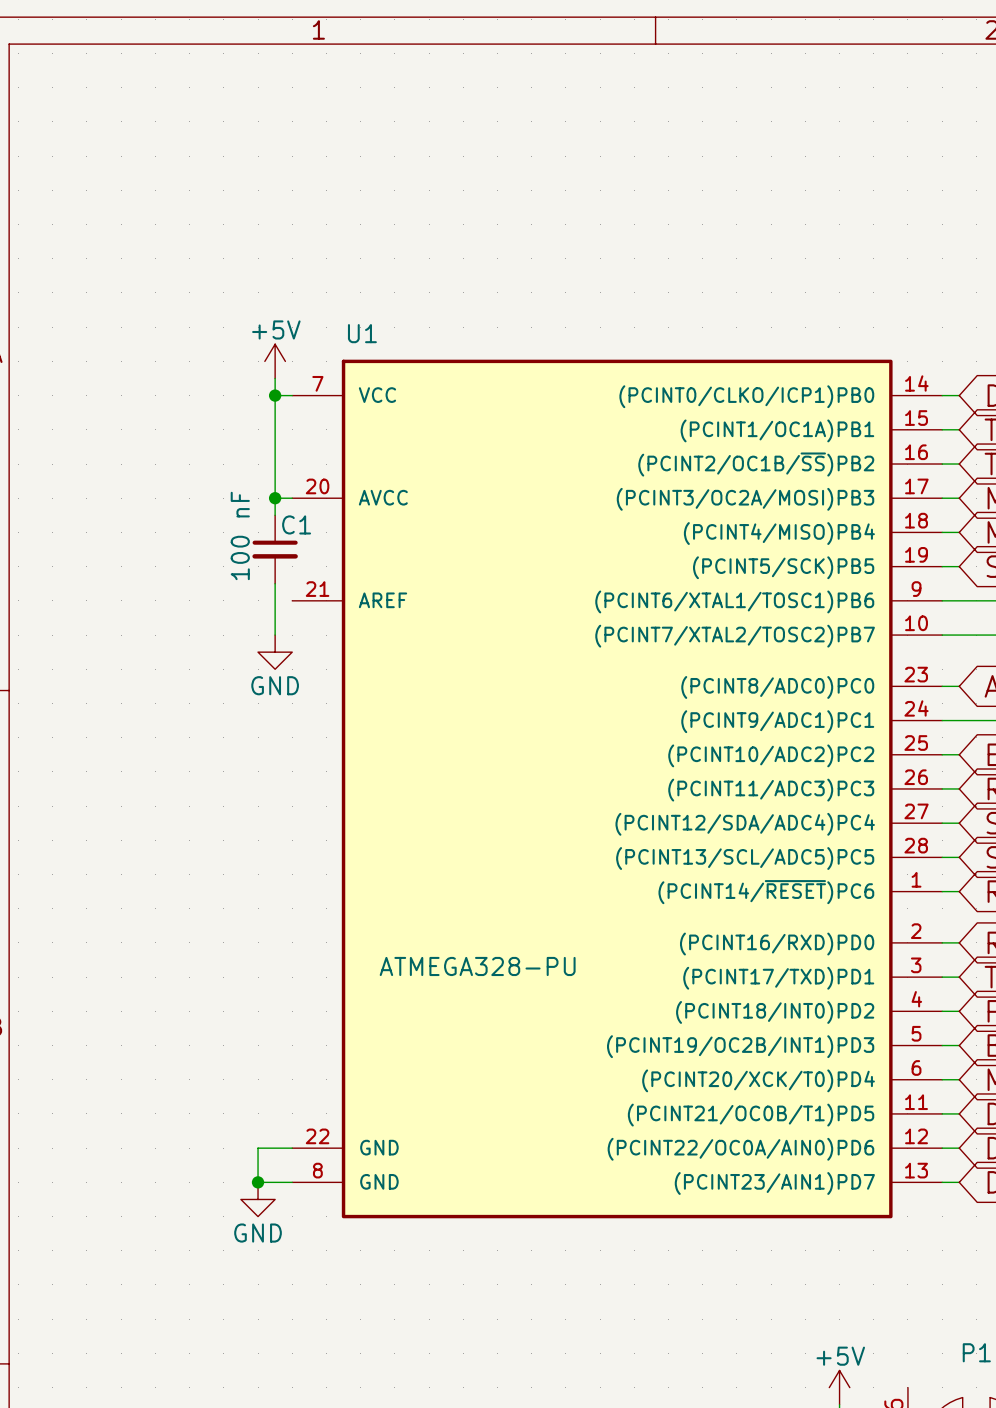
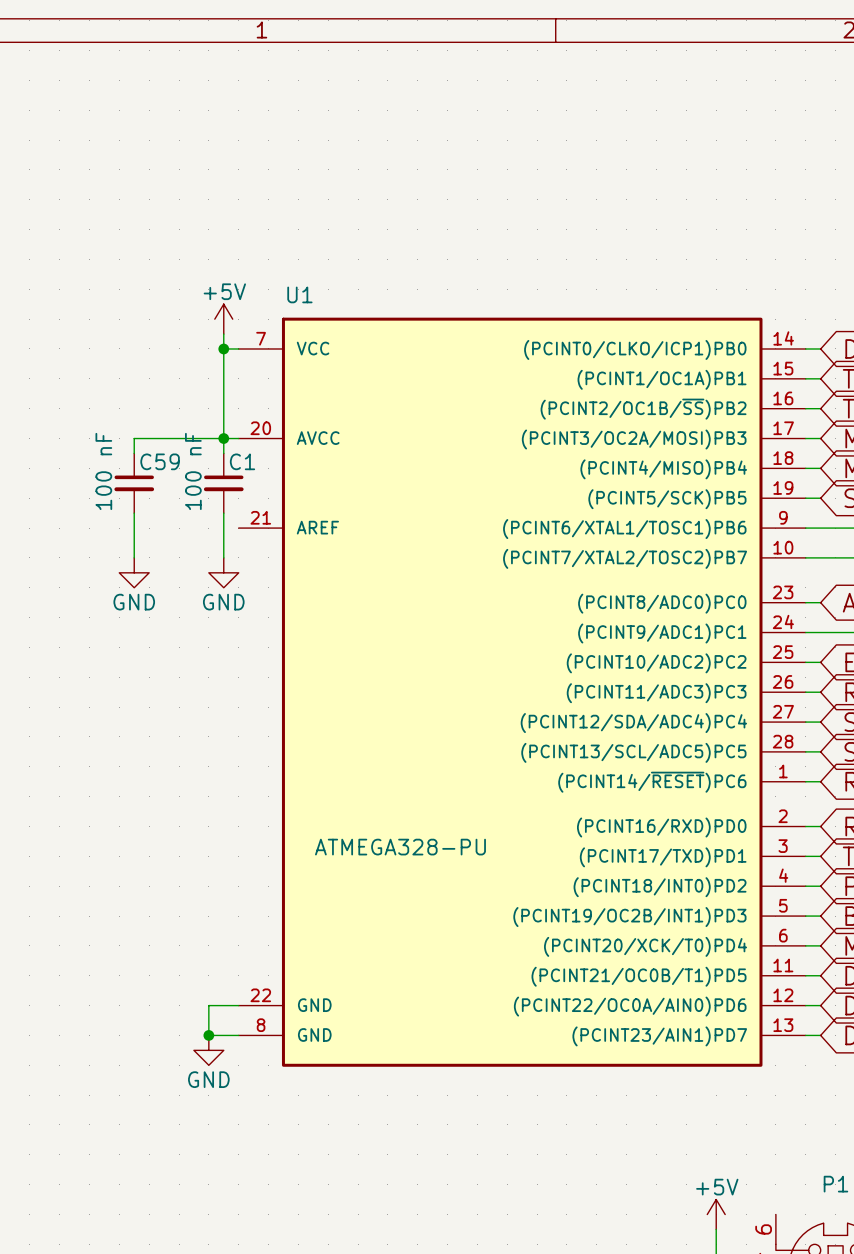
wire: none -> (223, 438) (134, 438) (134, 453)
C59: none -> 100 nF (134, 483)
wire: none -> (134, 513) (134, 557)
power symbol: none -> GND (134, 572)

